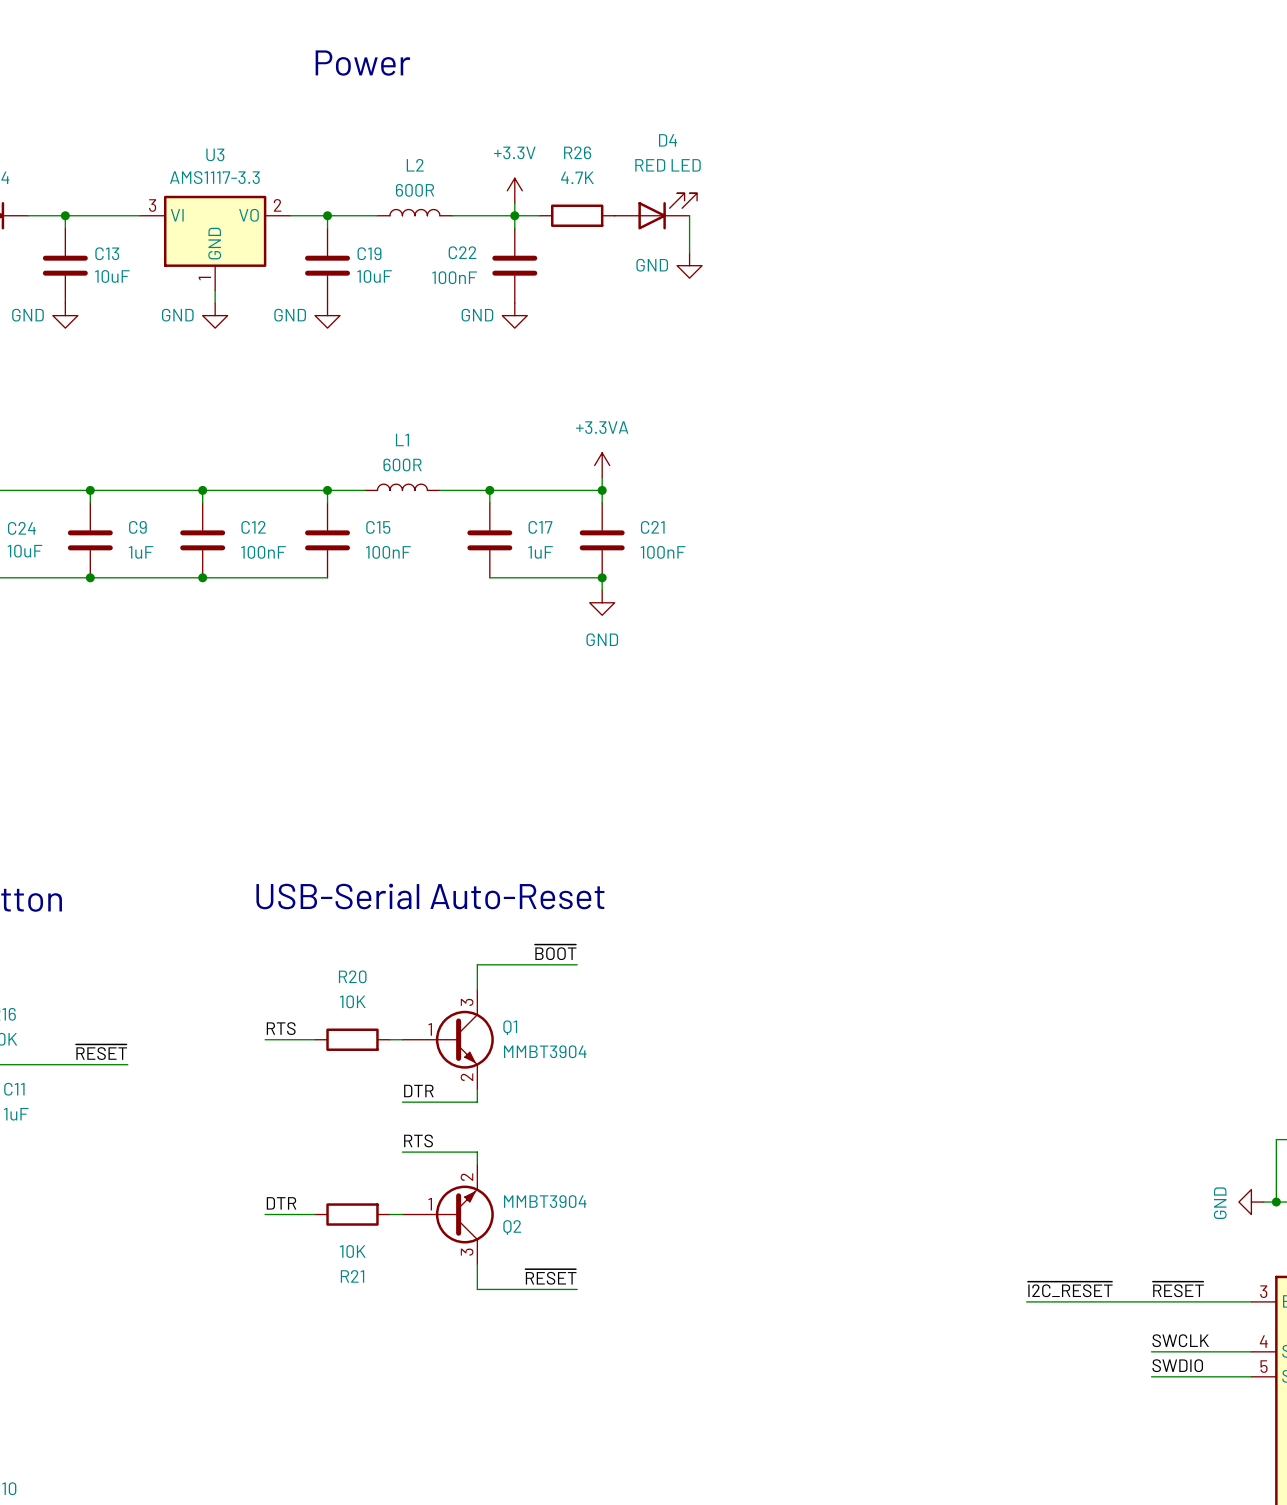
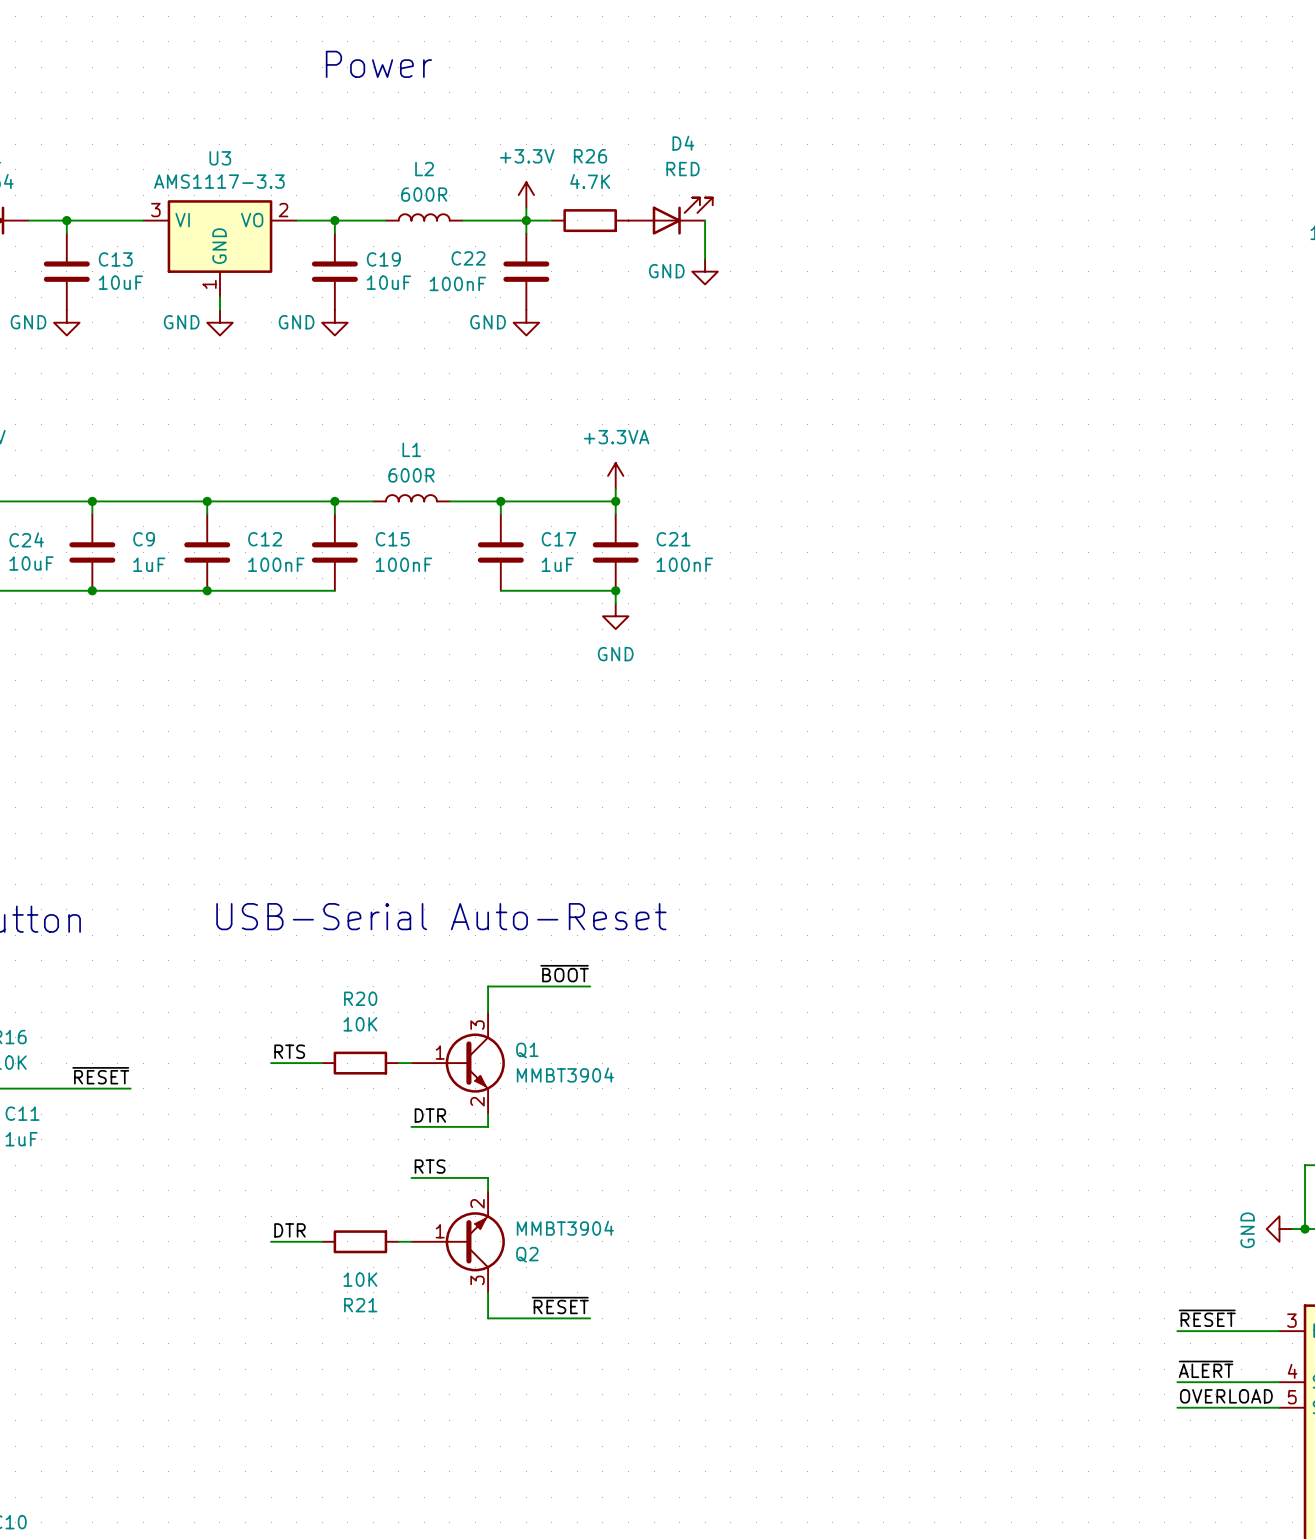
D4 value: RED LED (668, 165) -> RED (683, 169)
label: ~{I2C_RESET} (1070, 1289) -> none
wire: (1026, 1301) (1151, 1301) -> none
label: SWCLK (1180, 1340) -> ~{ALERT} (1206, 1369)
label: SWDIO (1177, 1365) -> OVERLOAD (1226, 1396)

